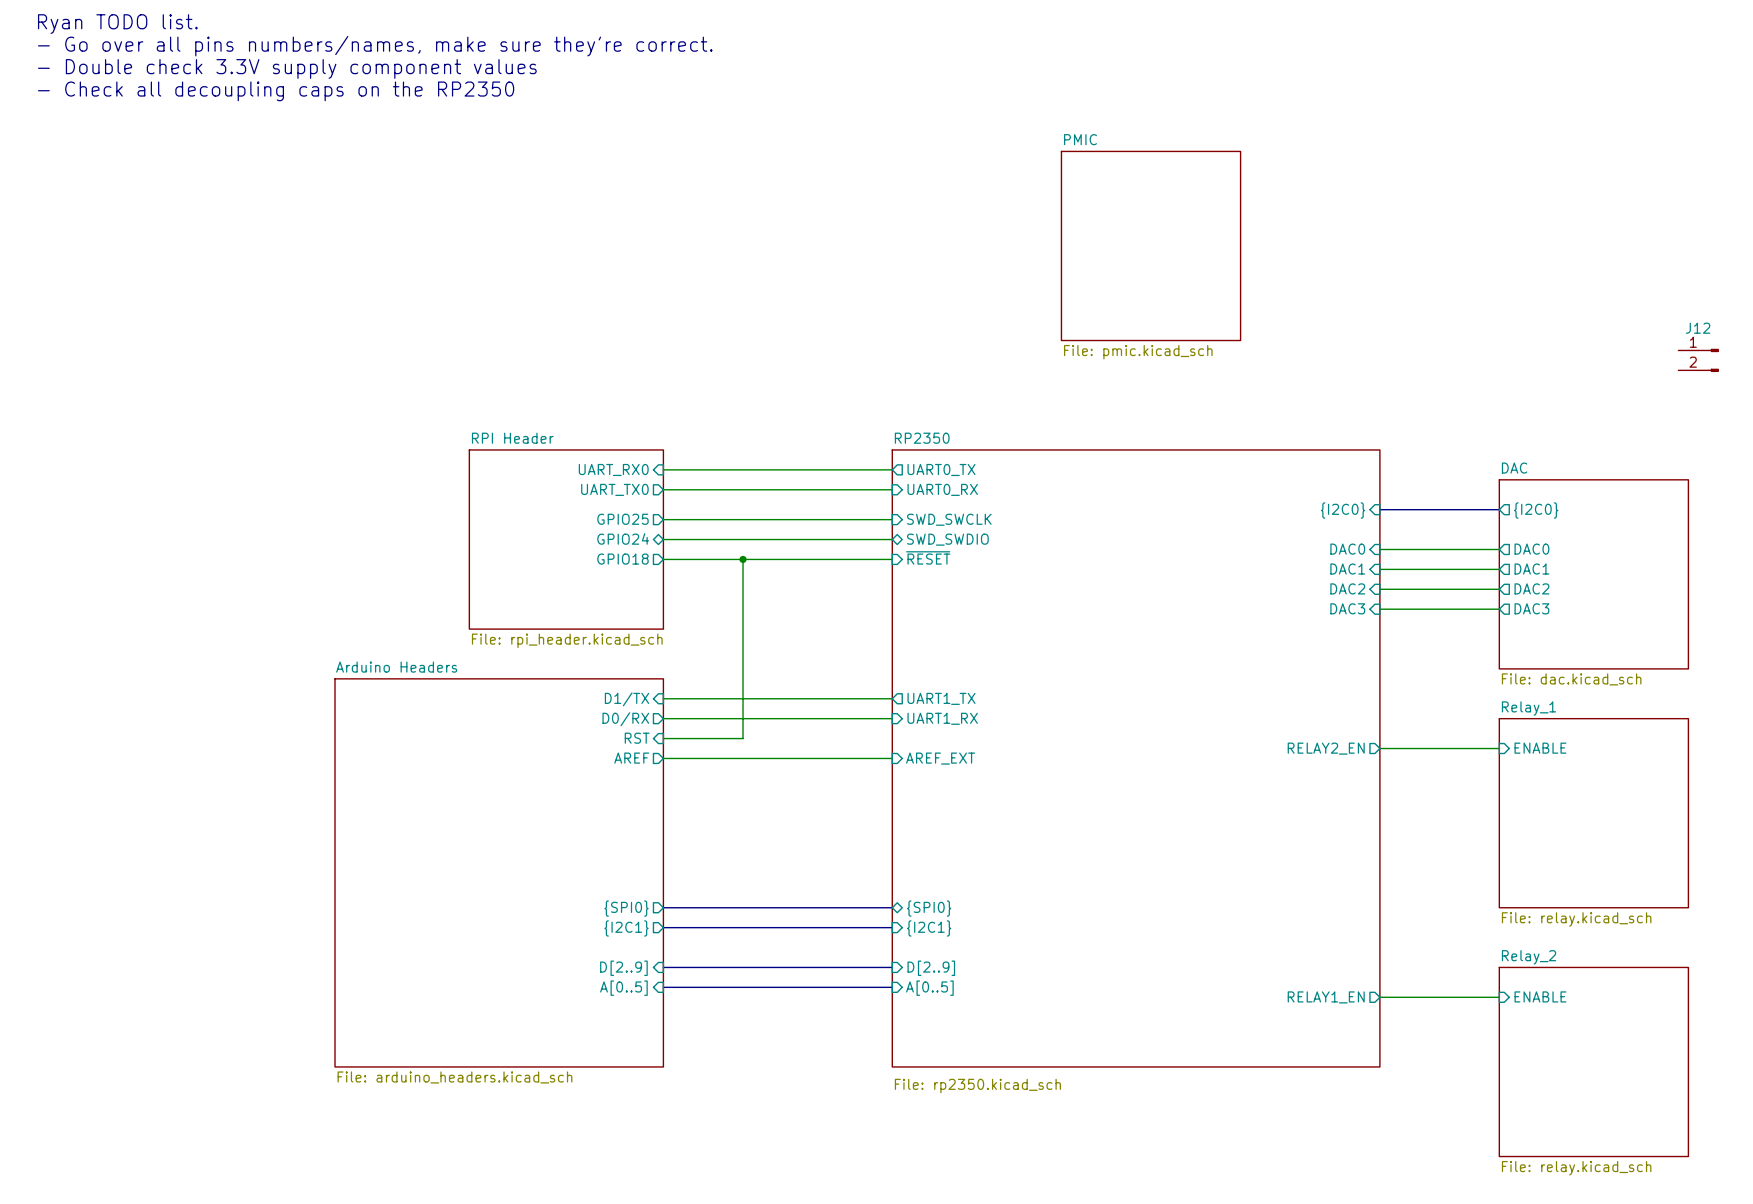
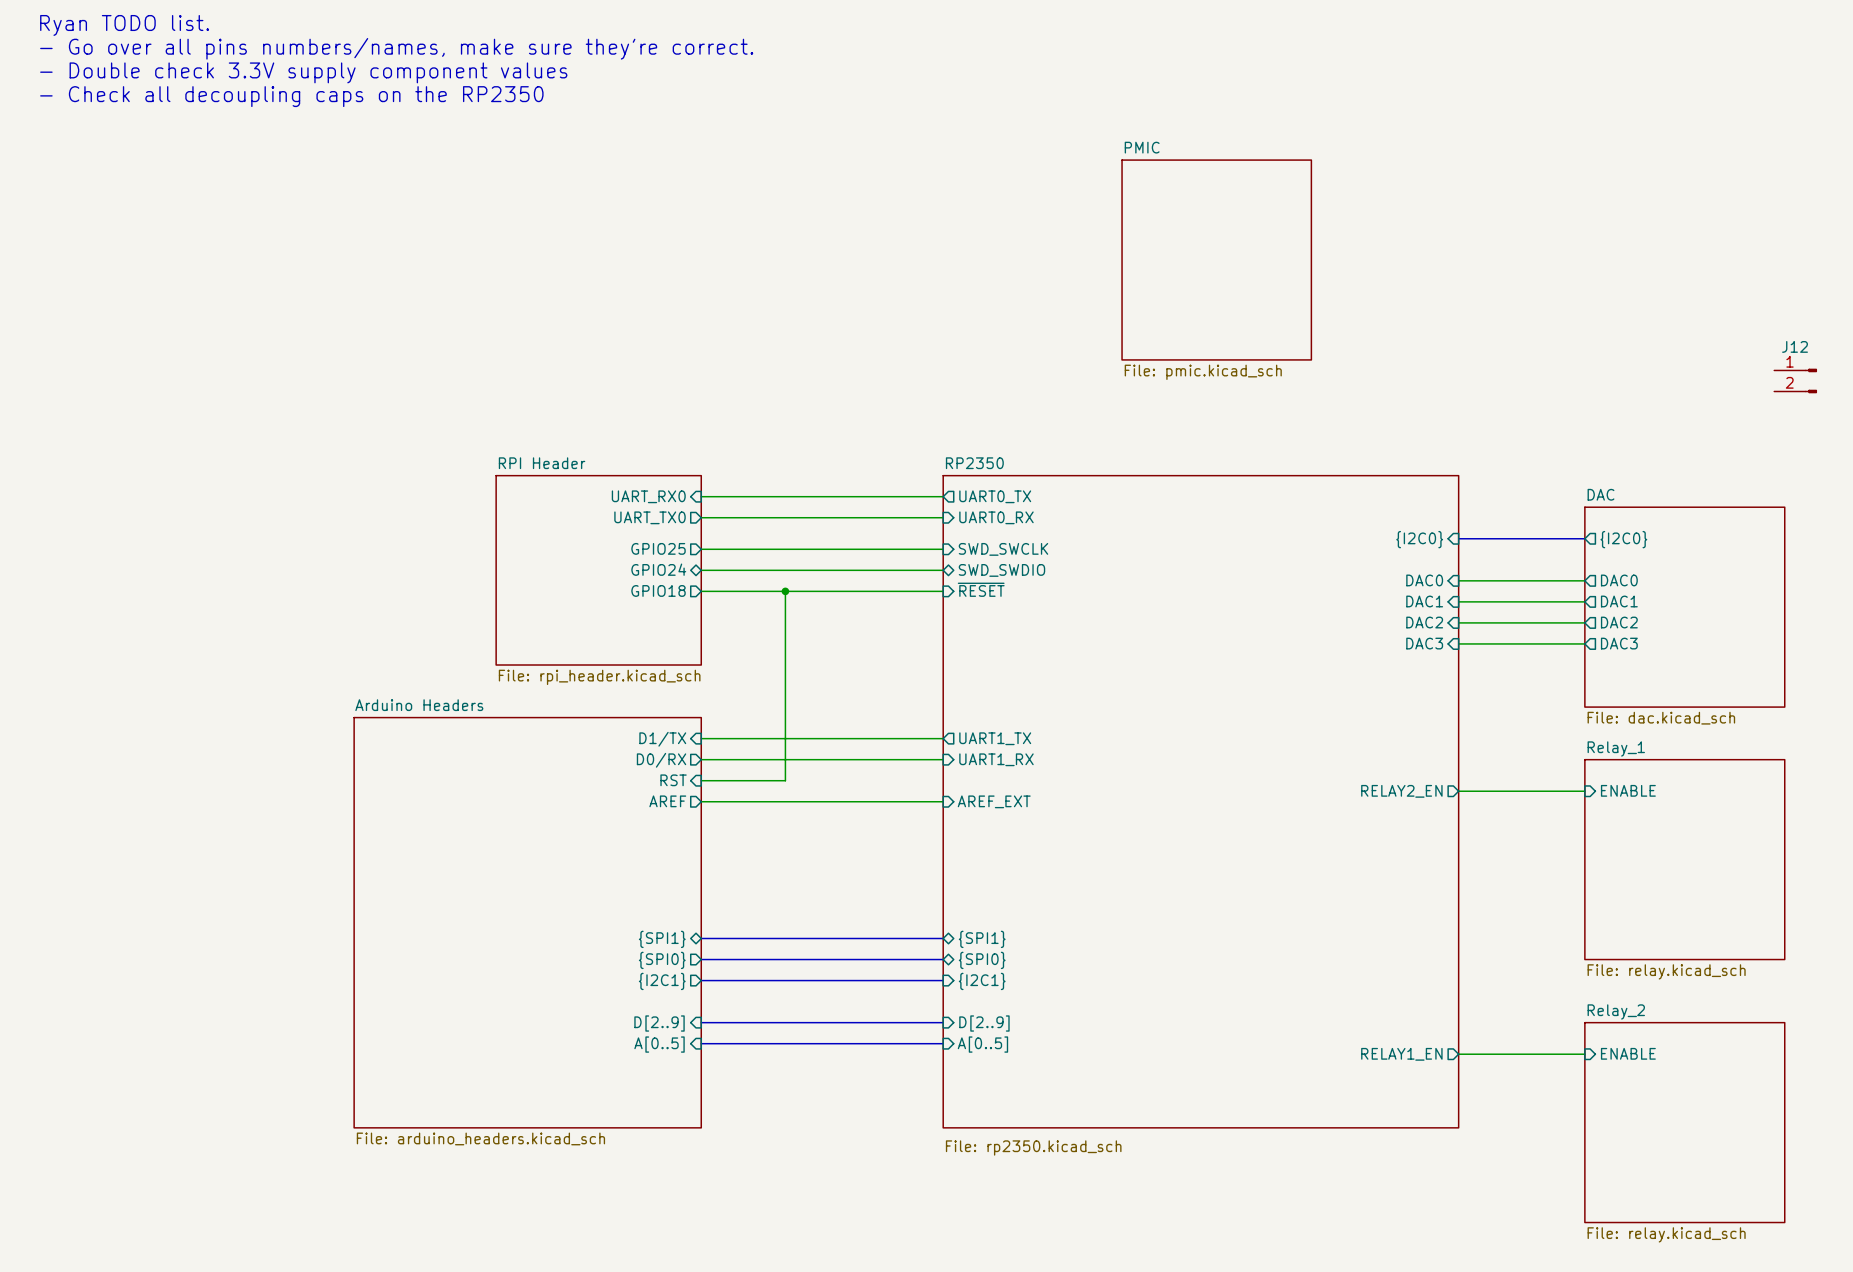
bus: none -> (701, 938) (943, 938)
sheet pin: none -> {SPI1} (662, 939)
sheet pin: none -> {SPI1} (982, 939)

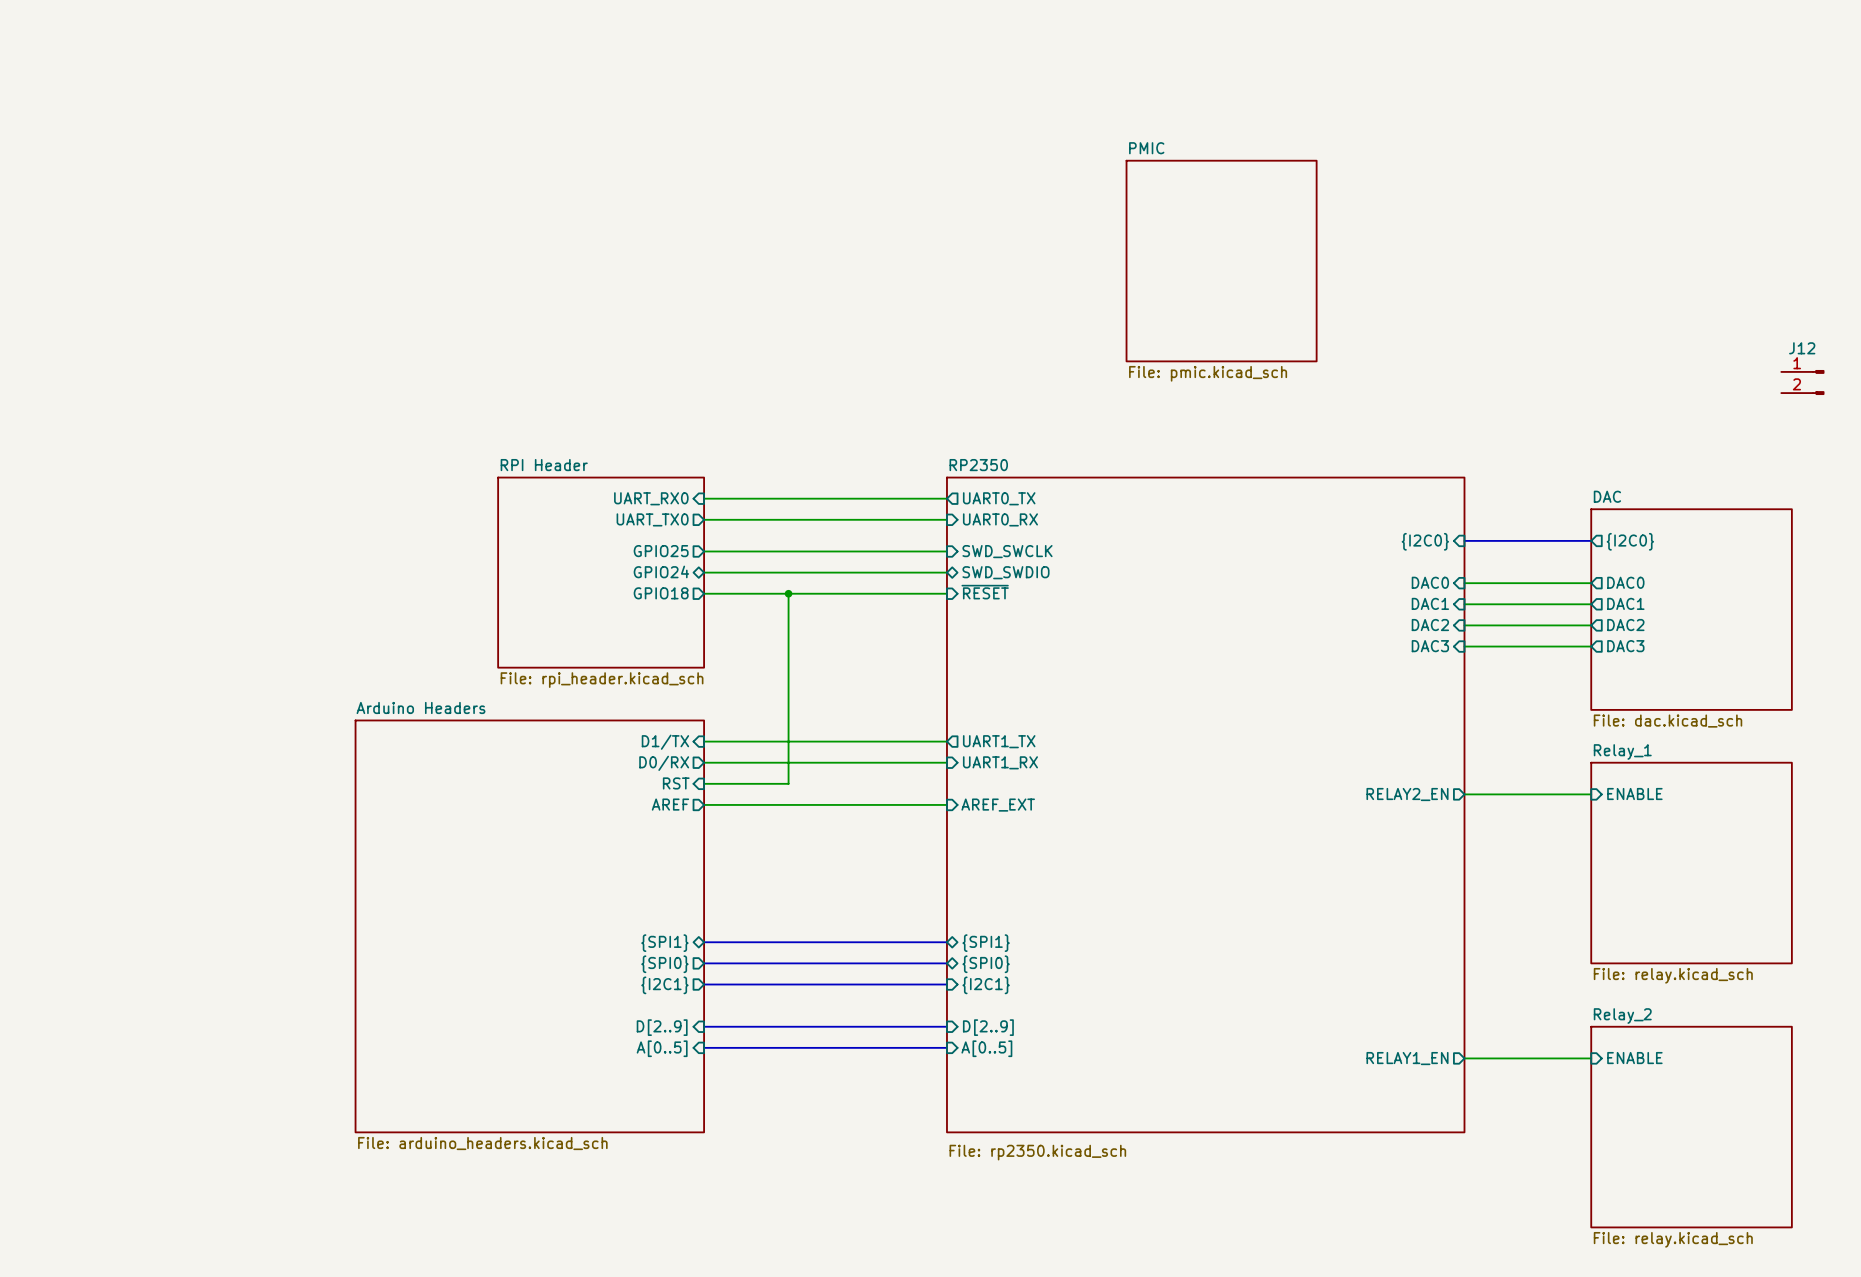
text: Ryan TODO list. (124, 25) -> none
text: - Go over all pins numbers/names, make sure they're correct. (396, 48) -> none
text: - Double check 3.3V supply component values (303, 72) -> none
text: - Check all decoupling caps on the RP2350 (291, 96) -> none

